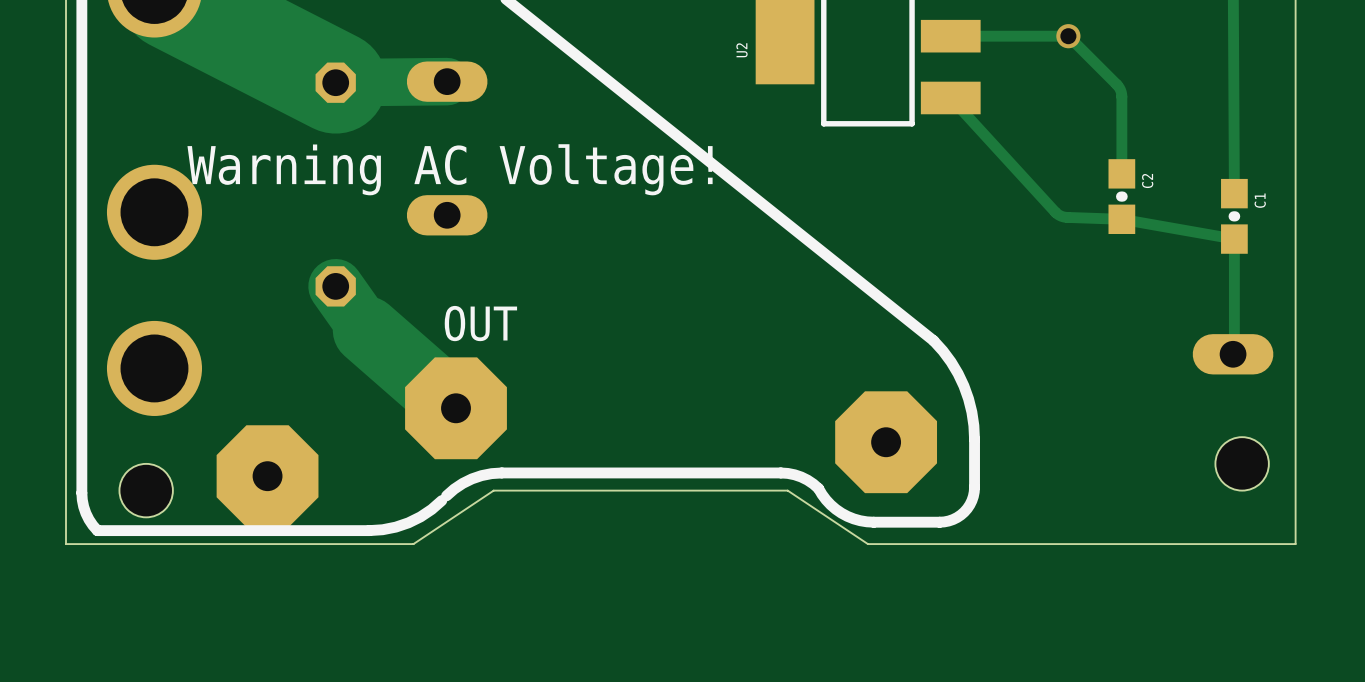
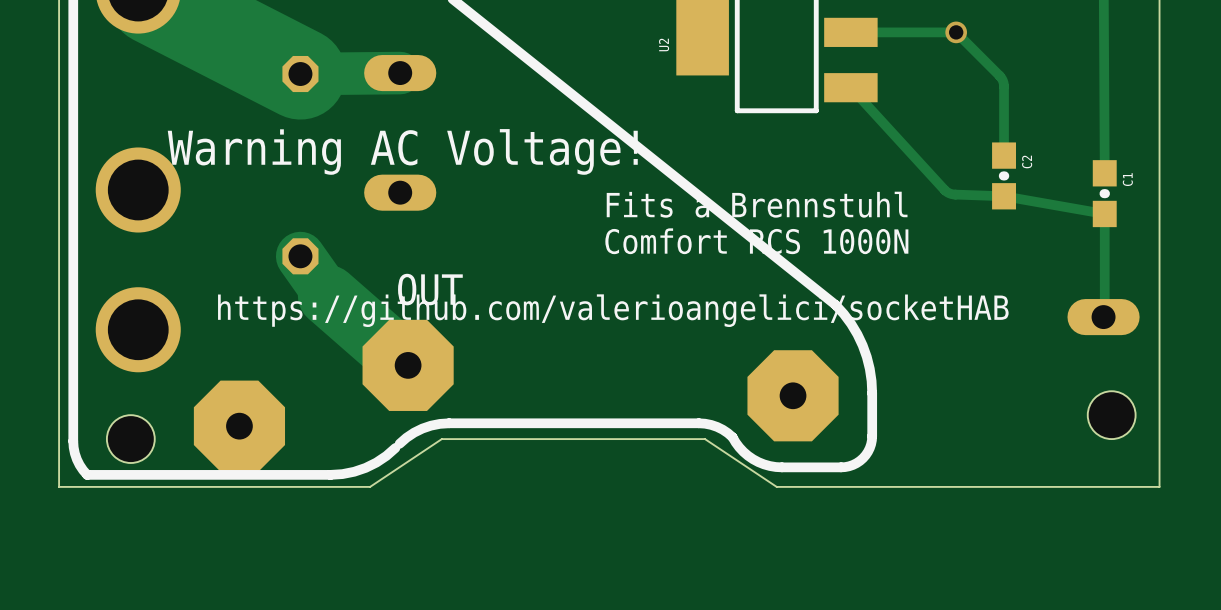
text: none -> Fits a Brennstuhl (757, 204)
text: none -> Comfort RCS 1000N (756, 241)
text: none -> https://github.com/valerioangelici/socketHAB (613, 310)

